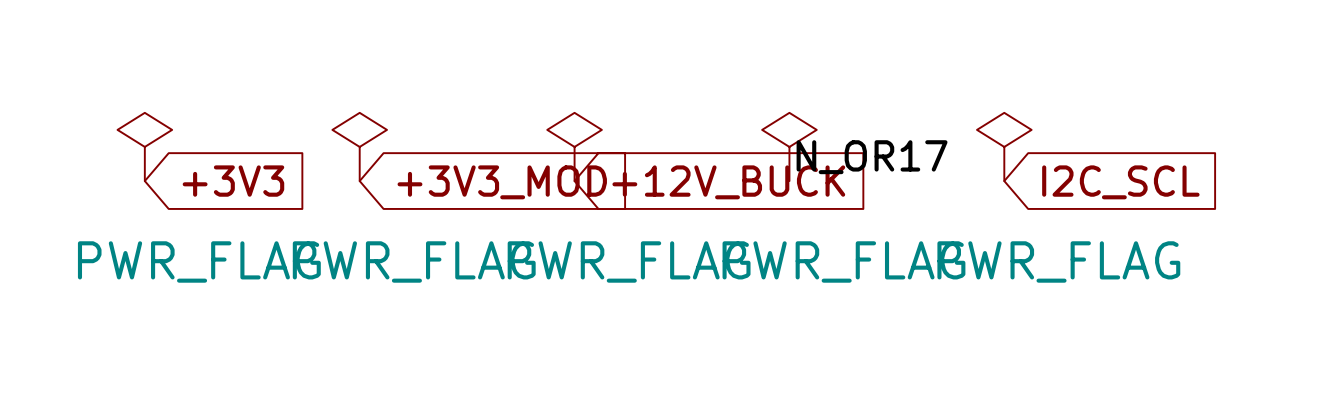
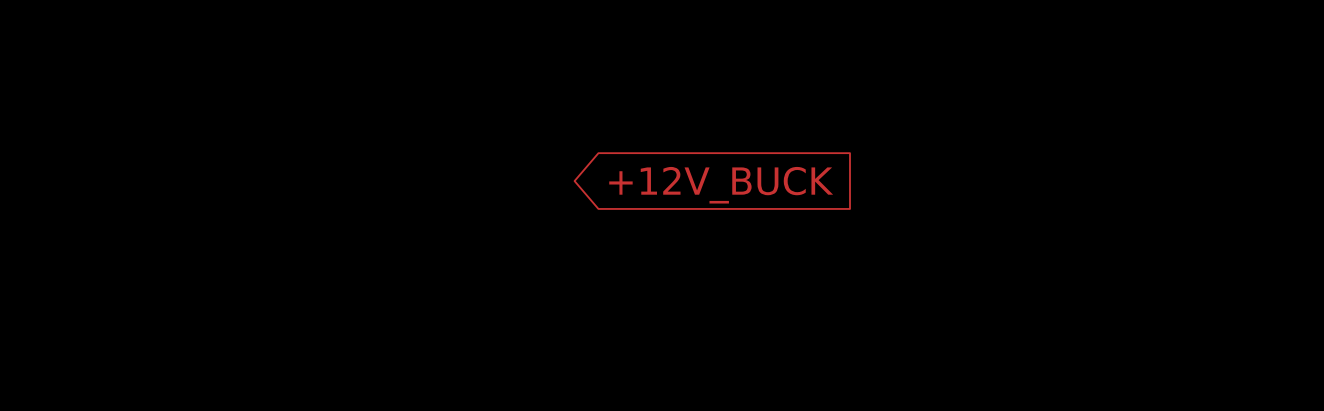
power symbol: PWR_FLAG (144, 146) -> none
power symbol: PWR_FLAG (359, 146) -> none
power symbol: PWR_FLAG (574, 146) -> none
power symbol: PWR_FLAG (789, 146) -> none
power symbol: PWR_FLAG (1004, 146) -> none
label: N_OR17 (872, 157) -> none
global label: +3V3 (233, 181) -> none
global label: +3V3_MOD (502, 182) -> none
global label: I2C_SCL (1120, 182) -> none

